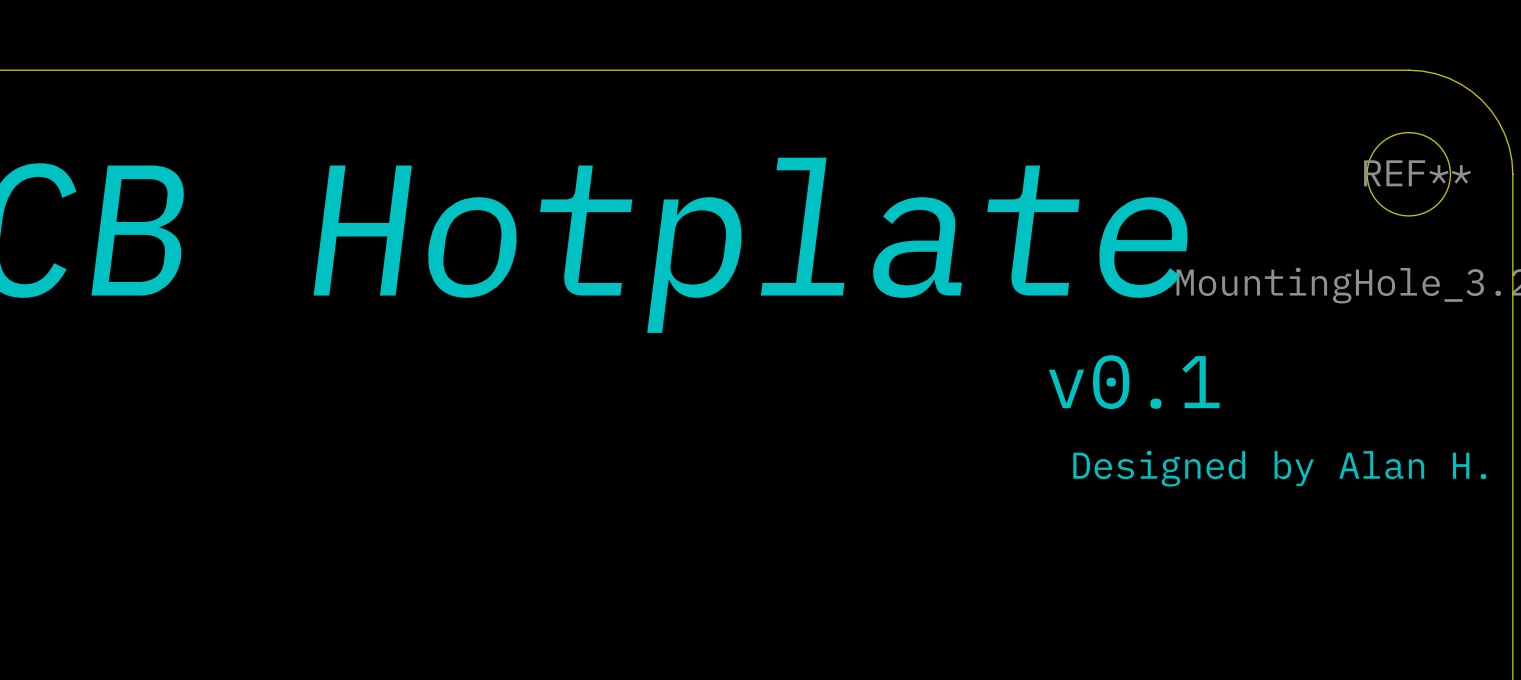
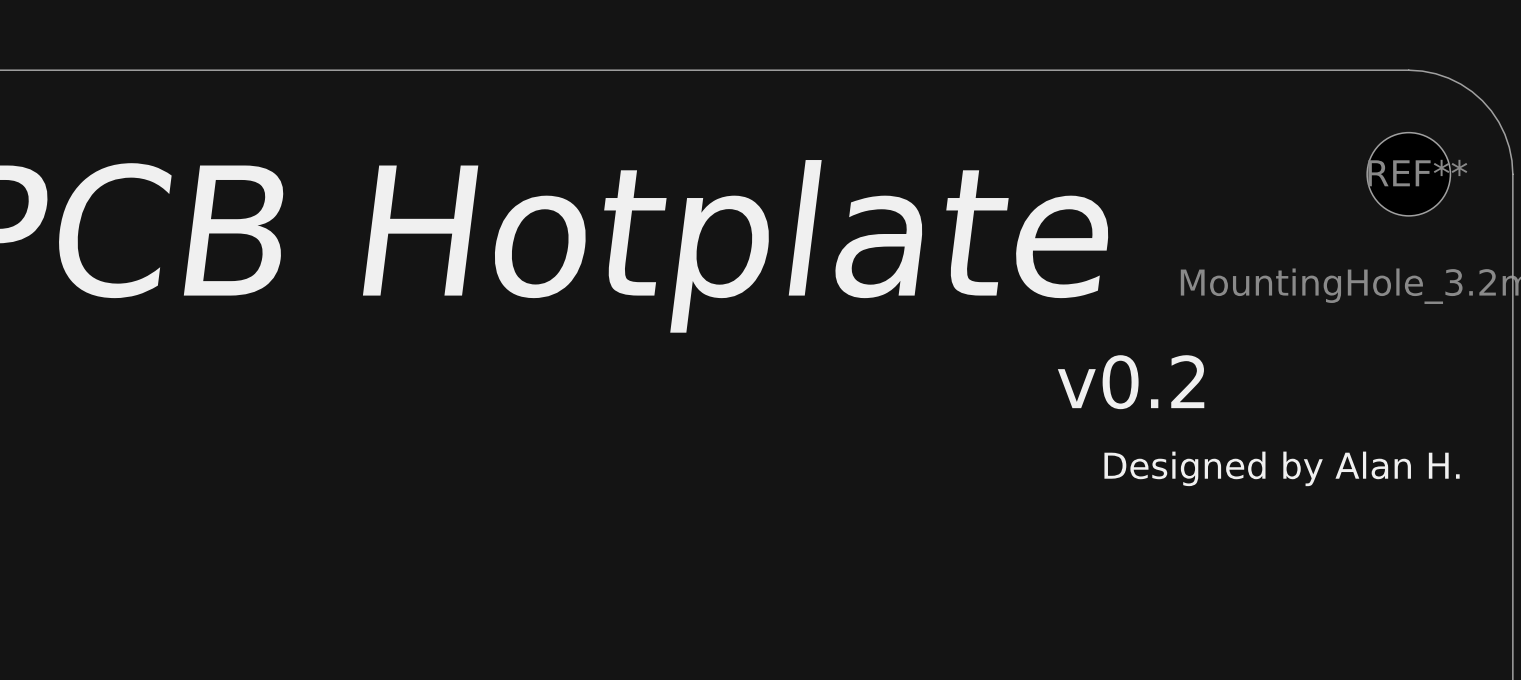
text: v0.1 (1134, 382) -> v0.2 (1131, 382)

